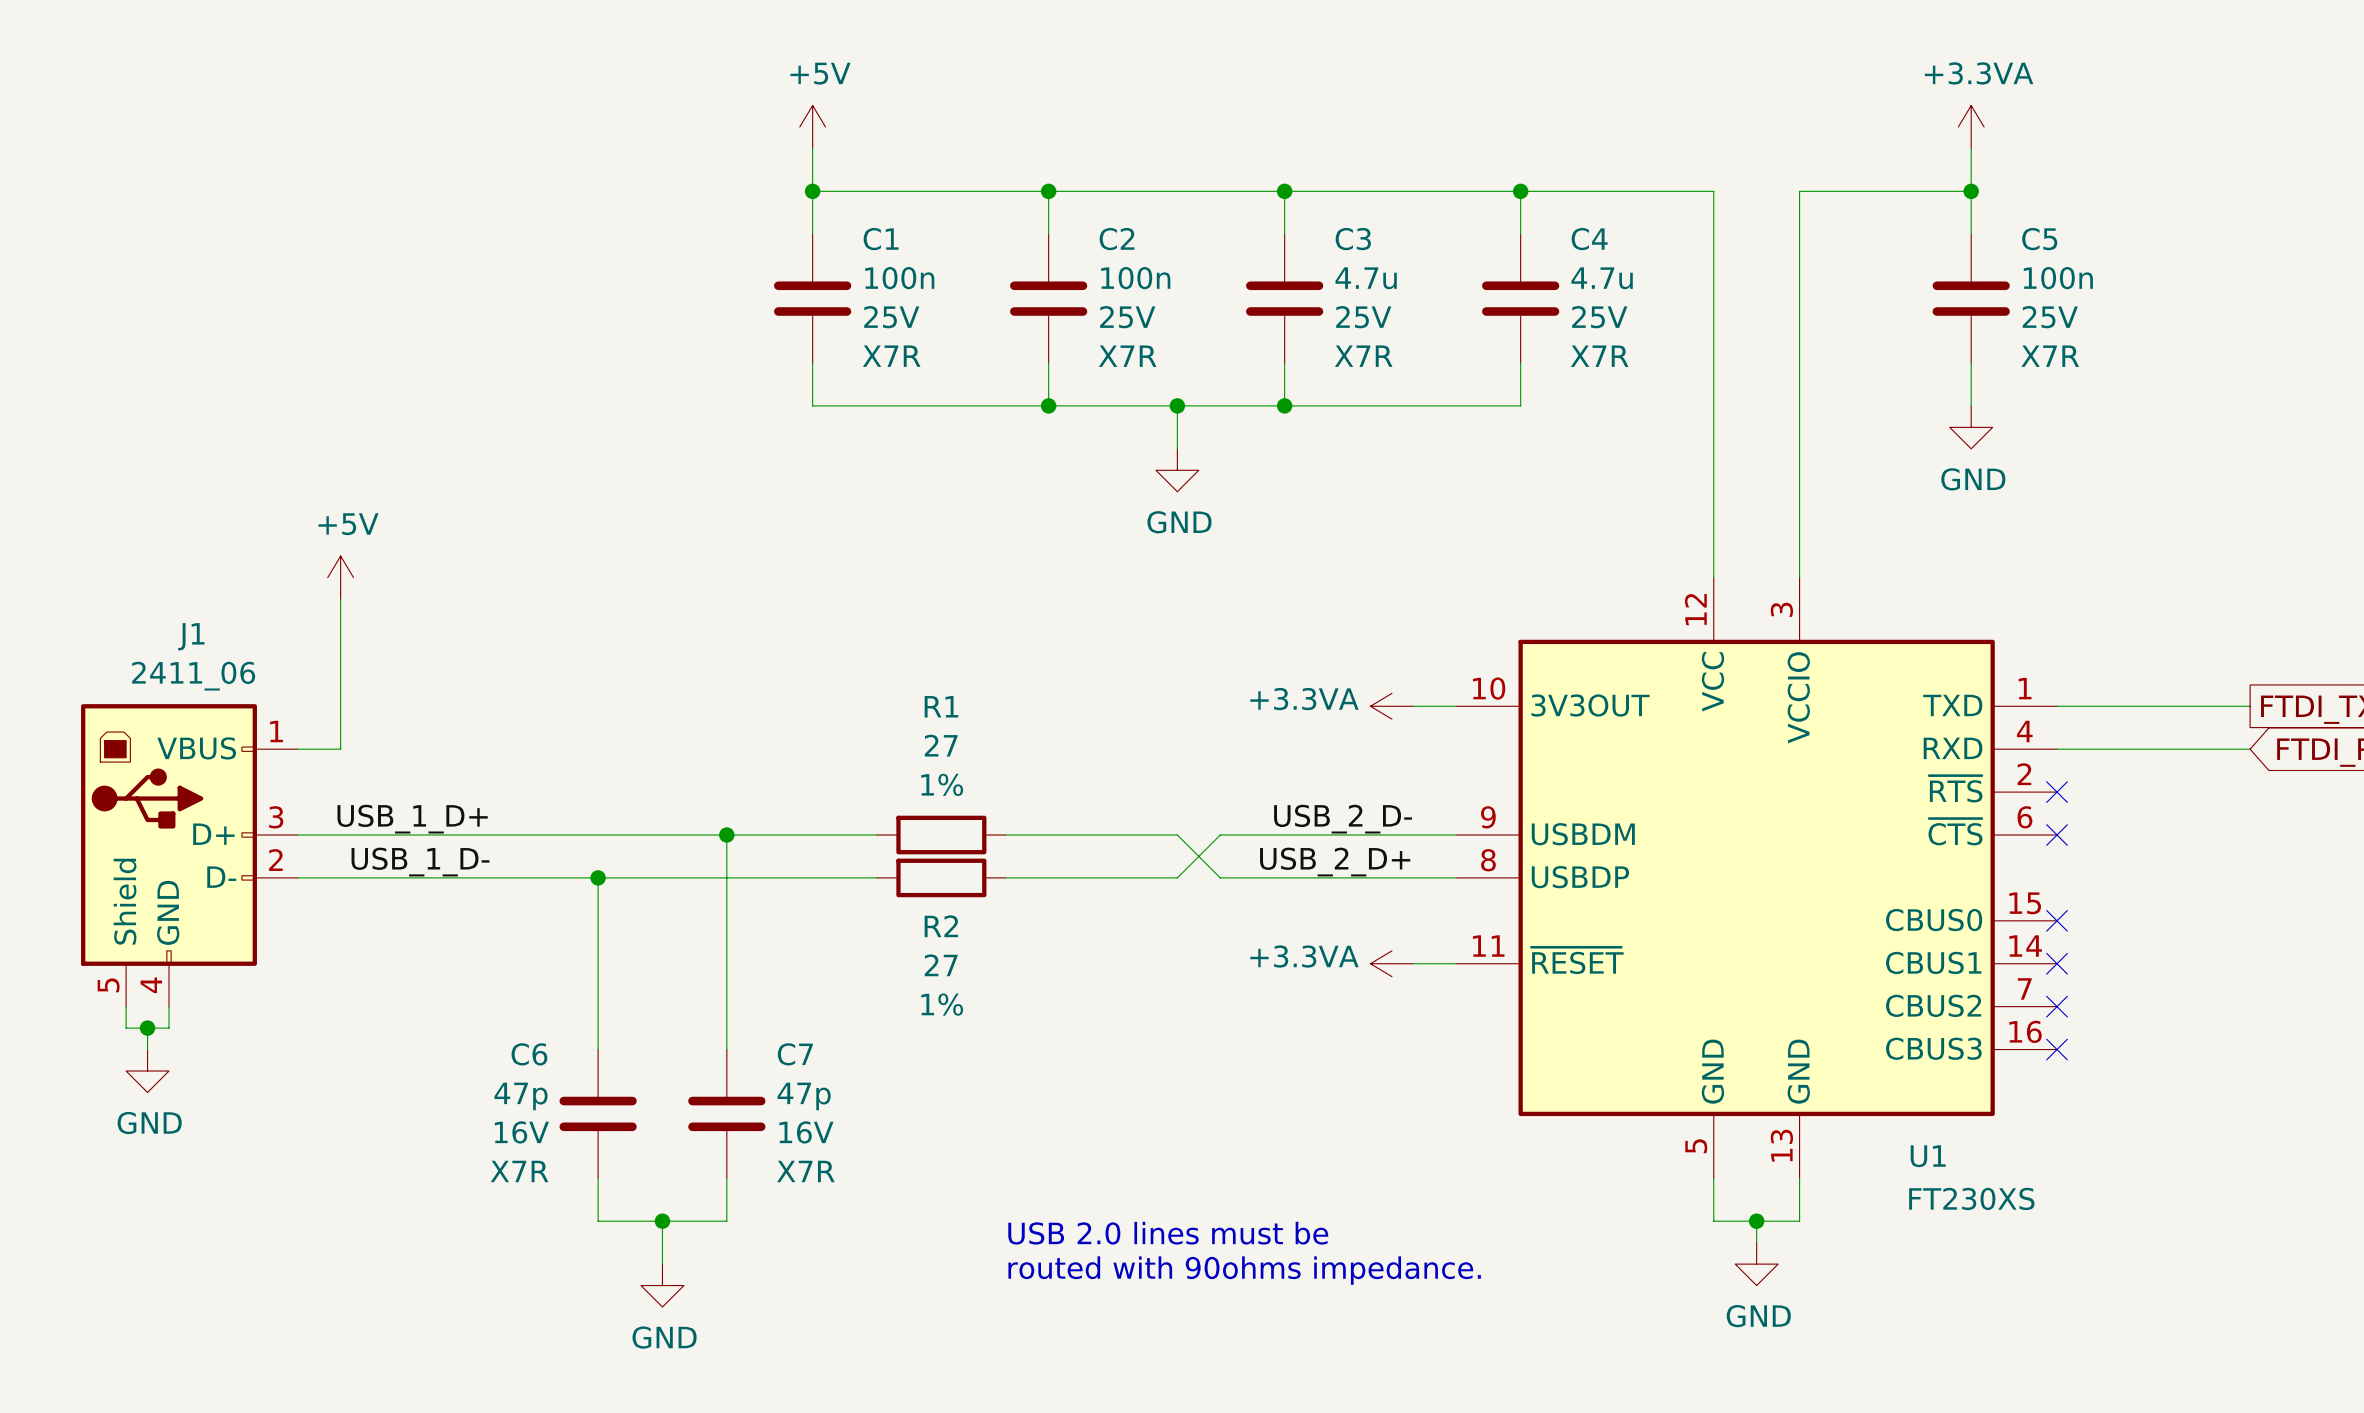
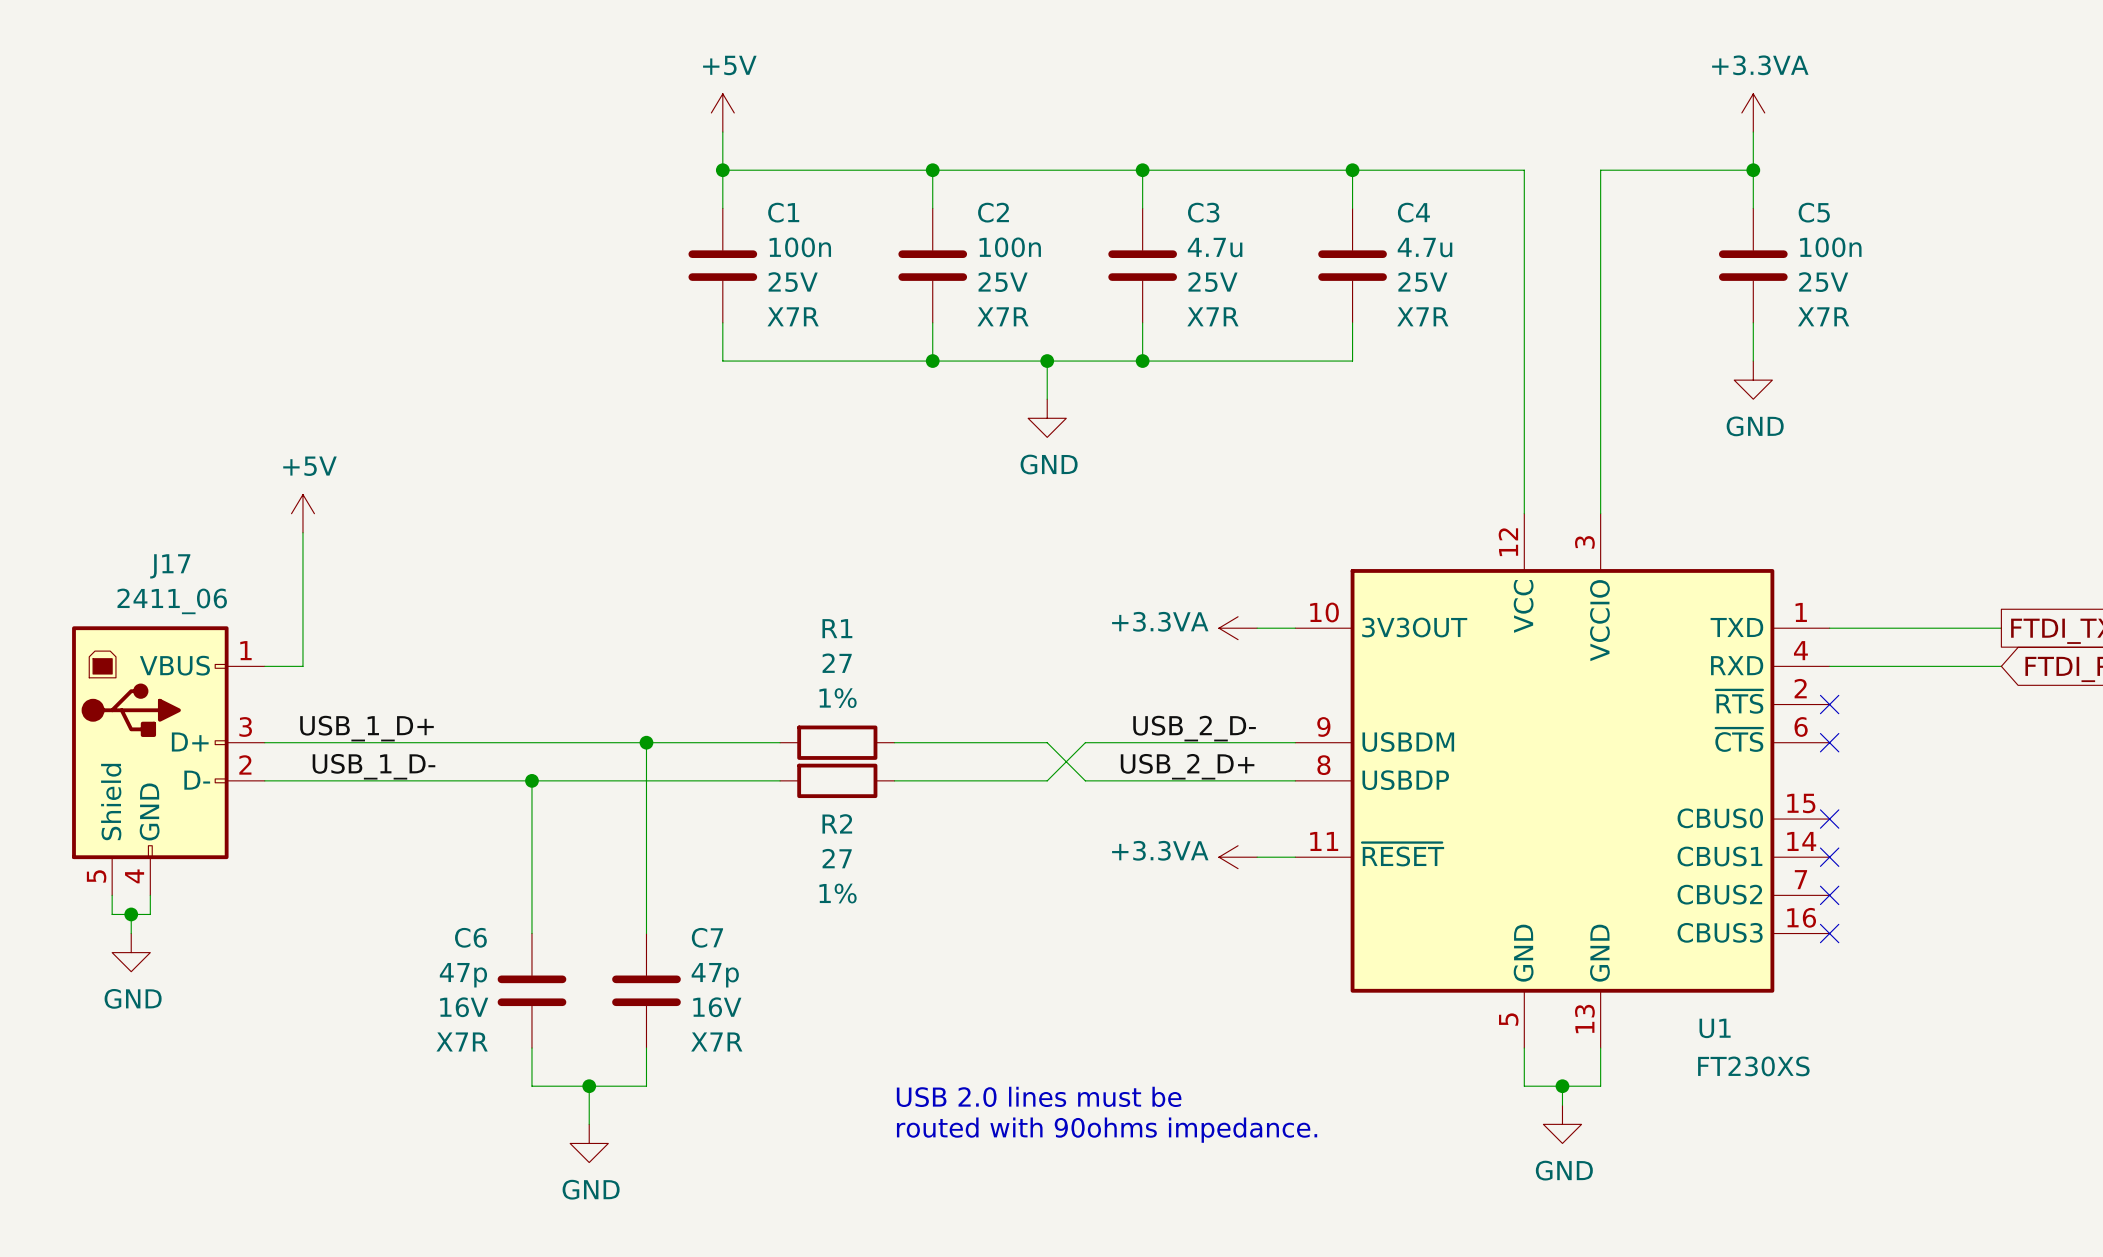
J1 name: J1 (191, 636) -> J17 (170, 566)

